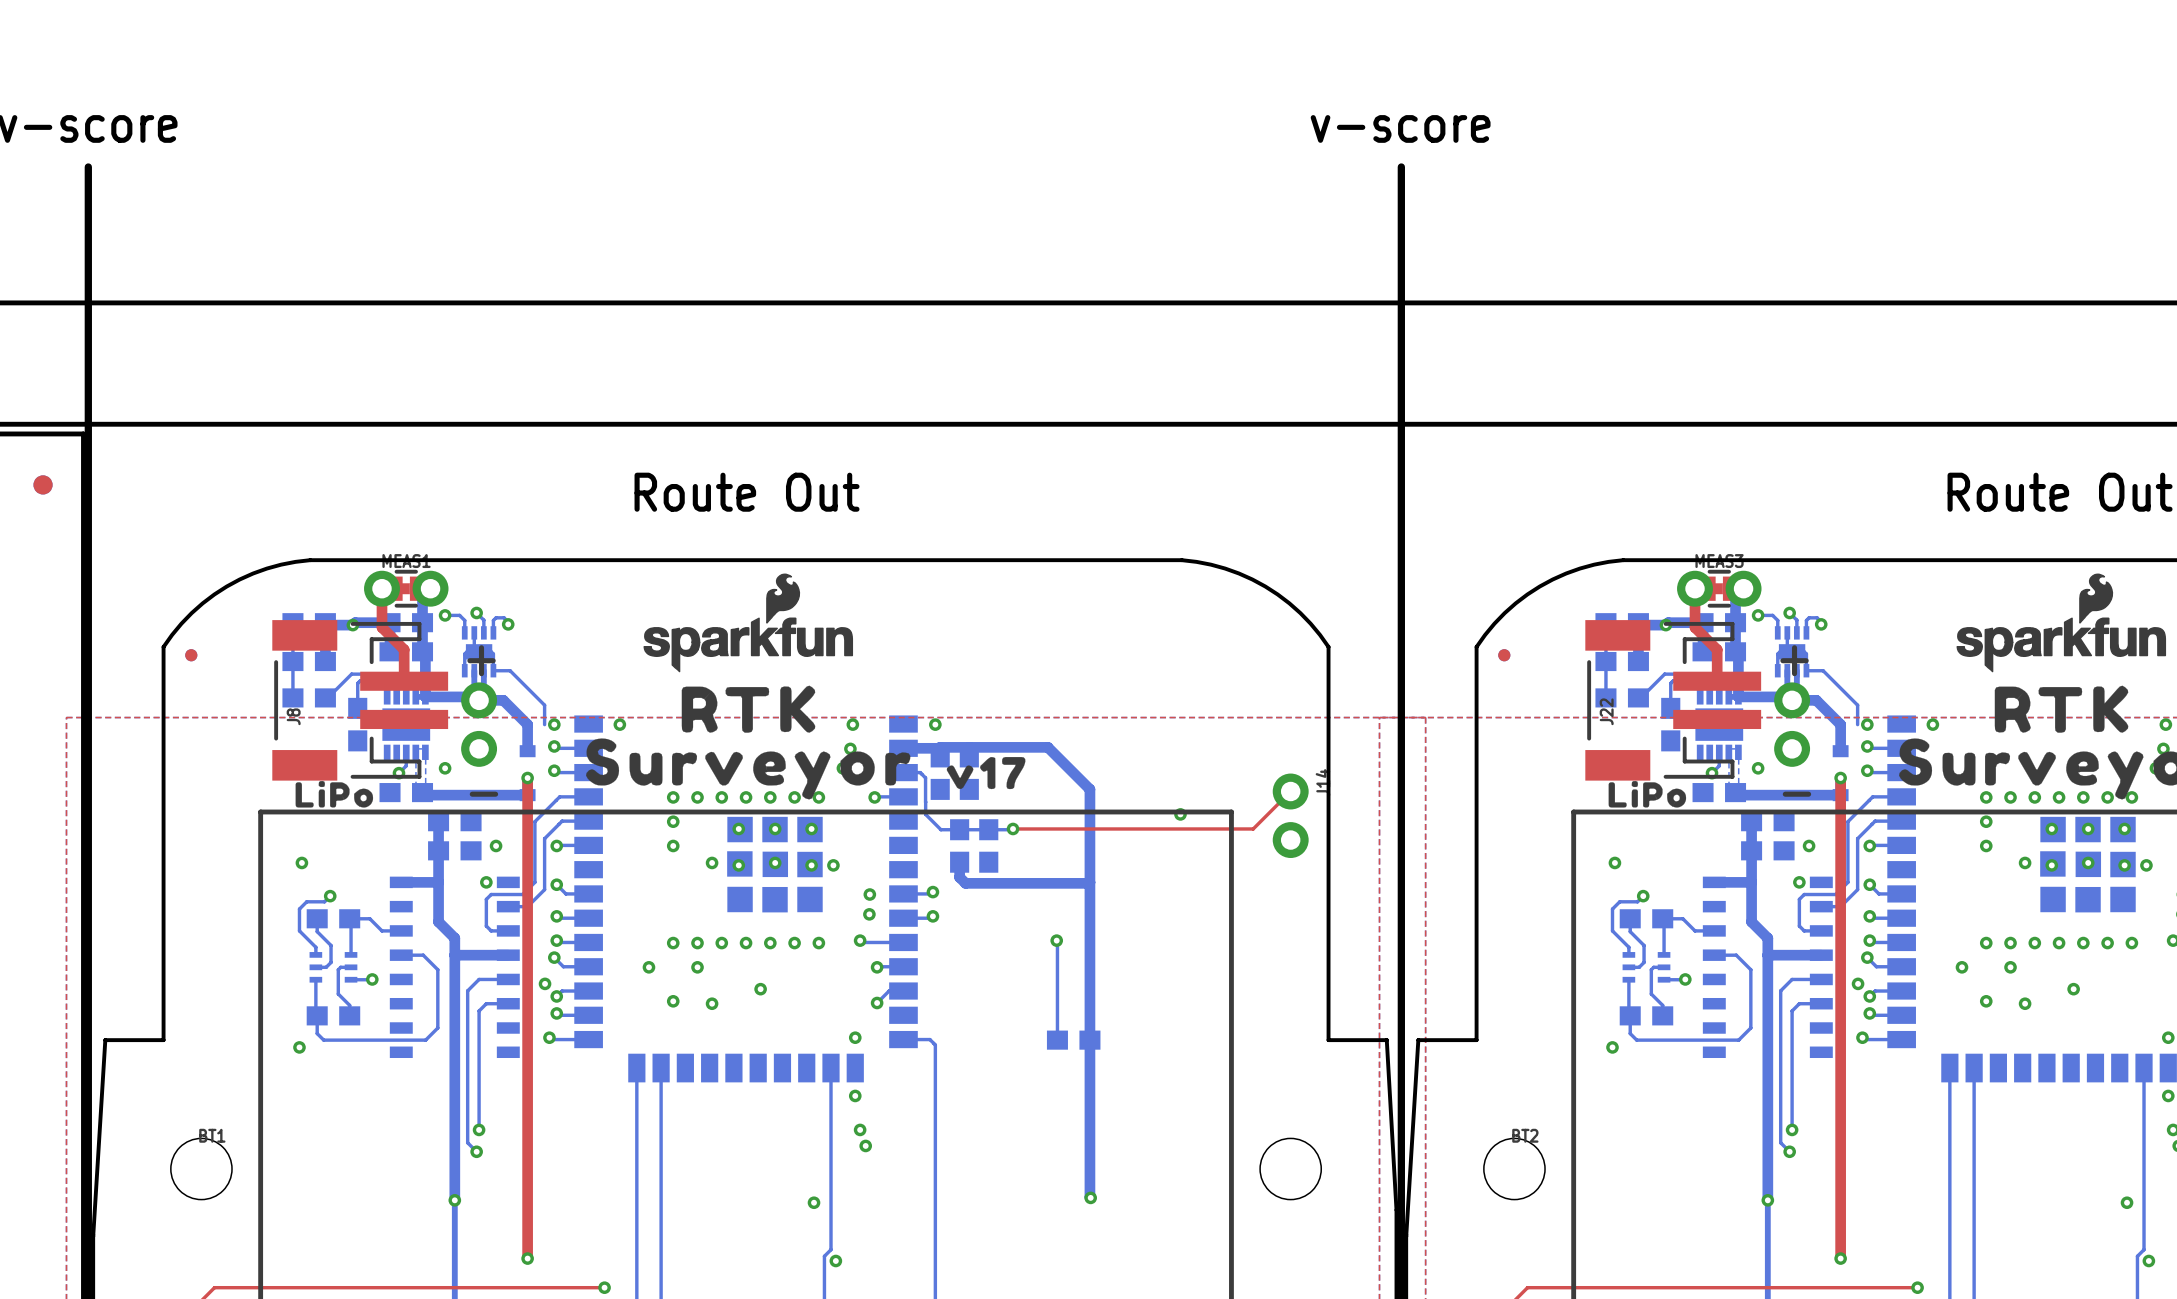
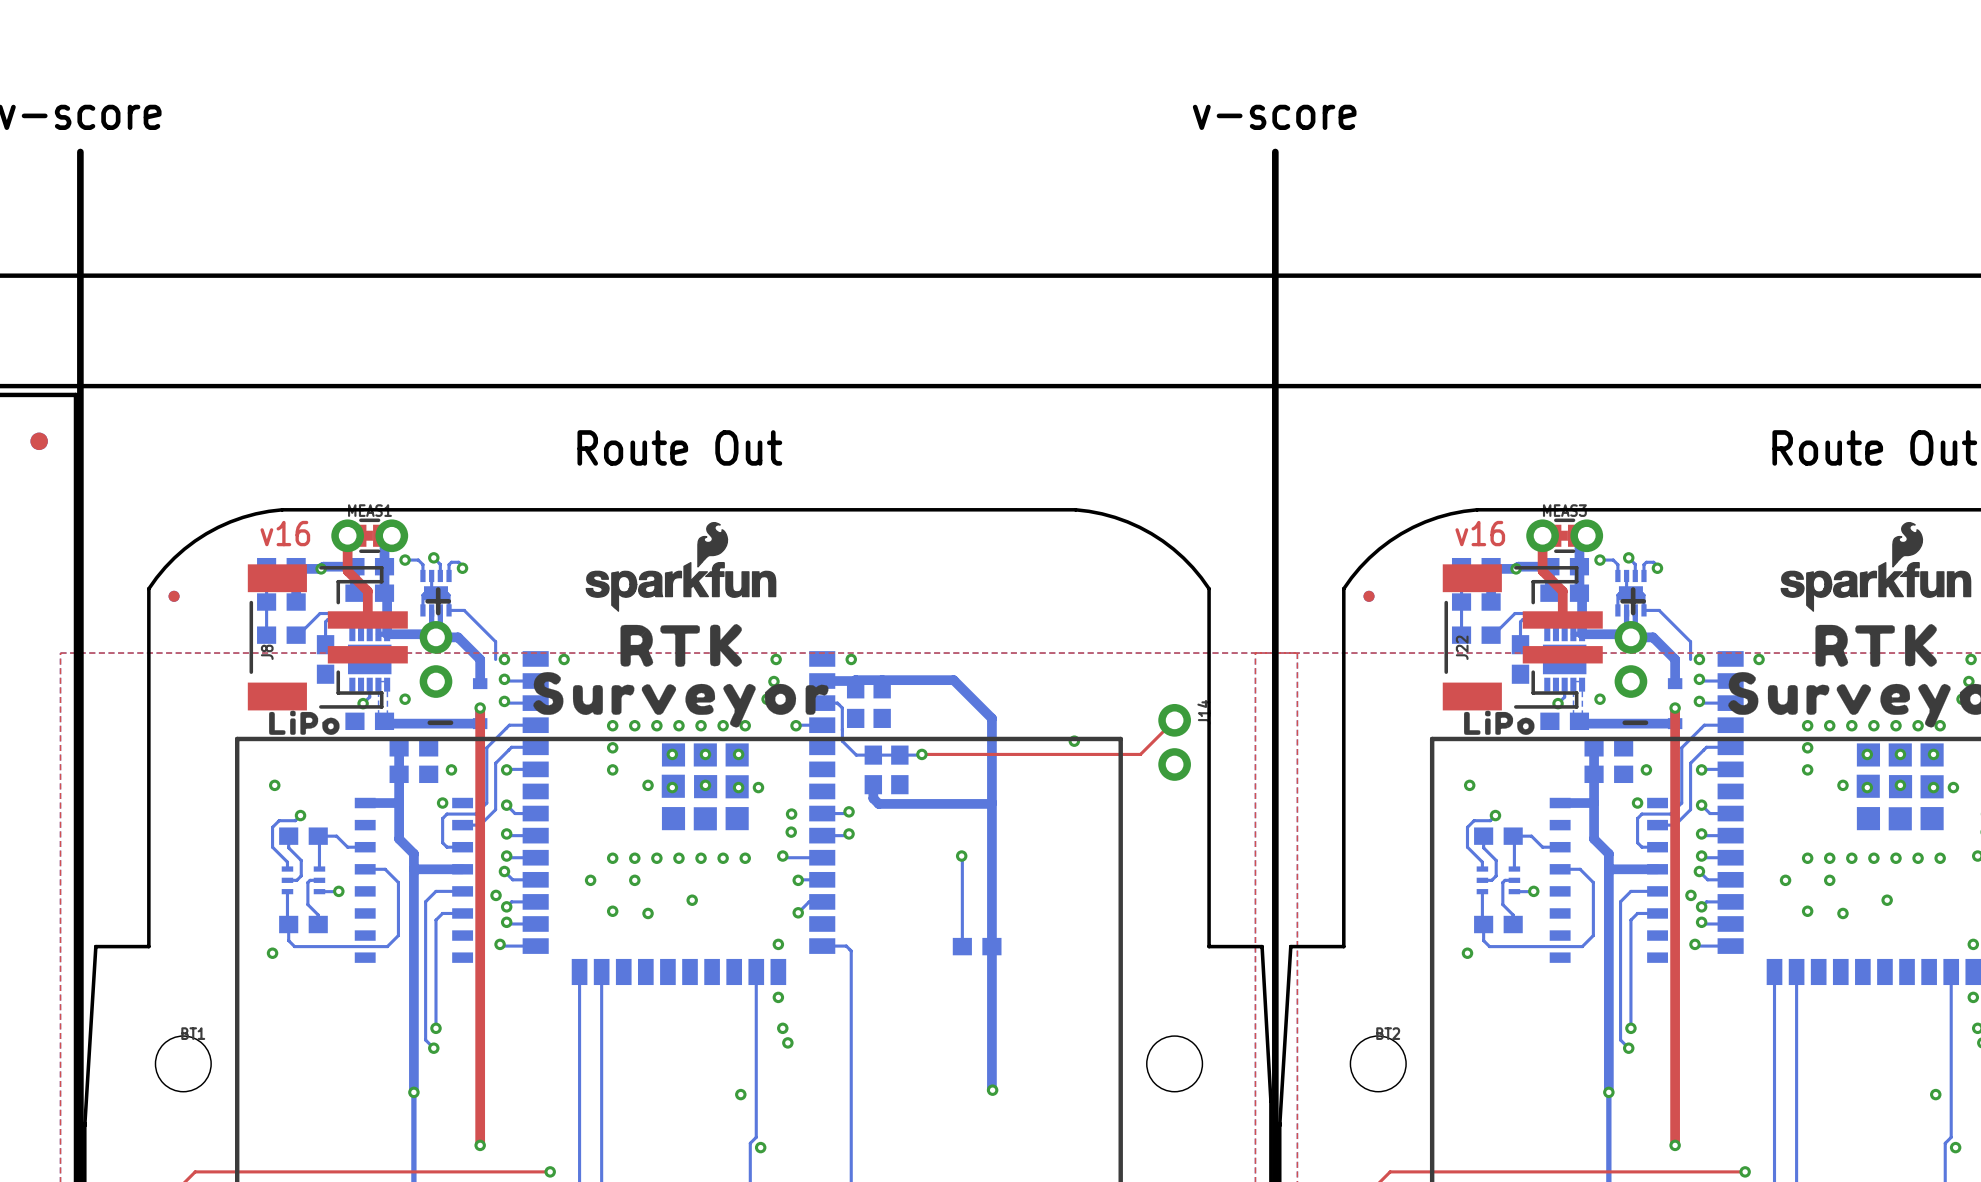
text: none -> v16 (285, 533)
text: none -> v16 (1480, 533)
drawing: [946, 757, 1026, 790] -> none

